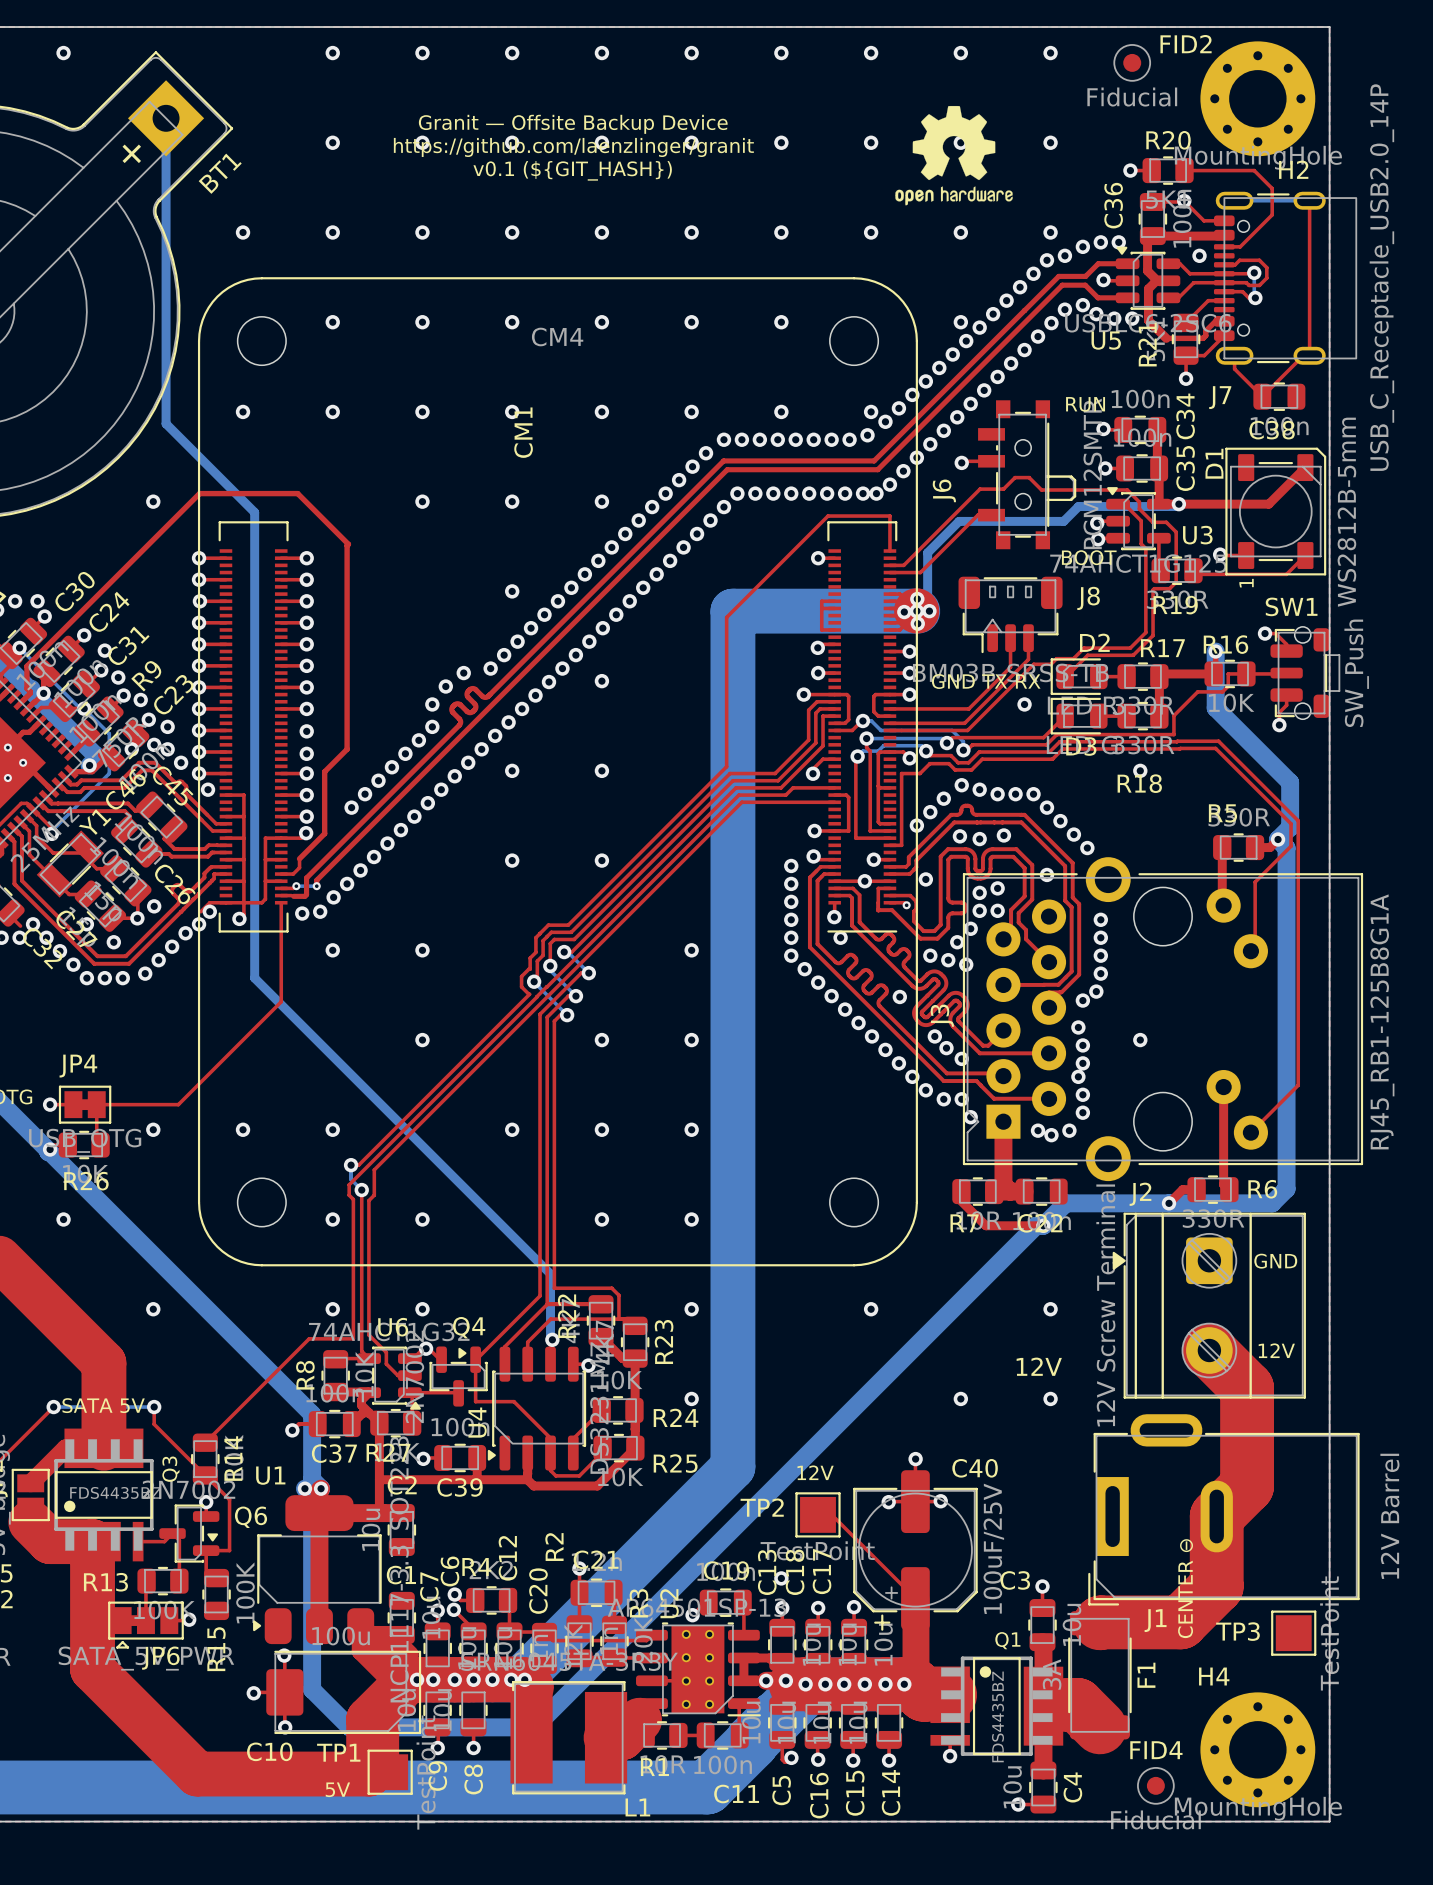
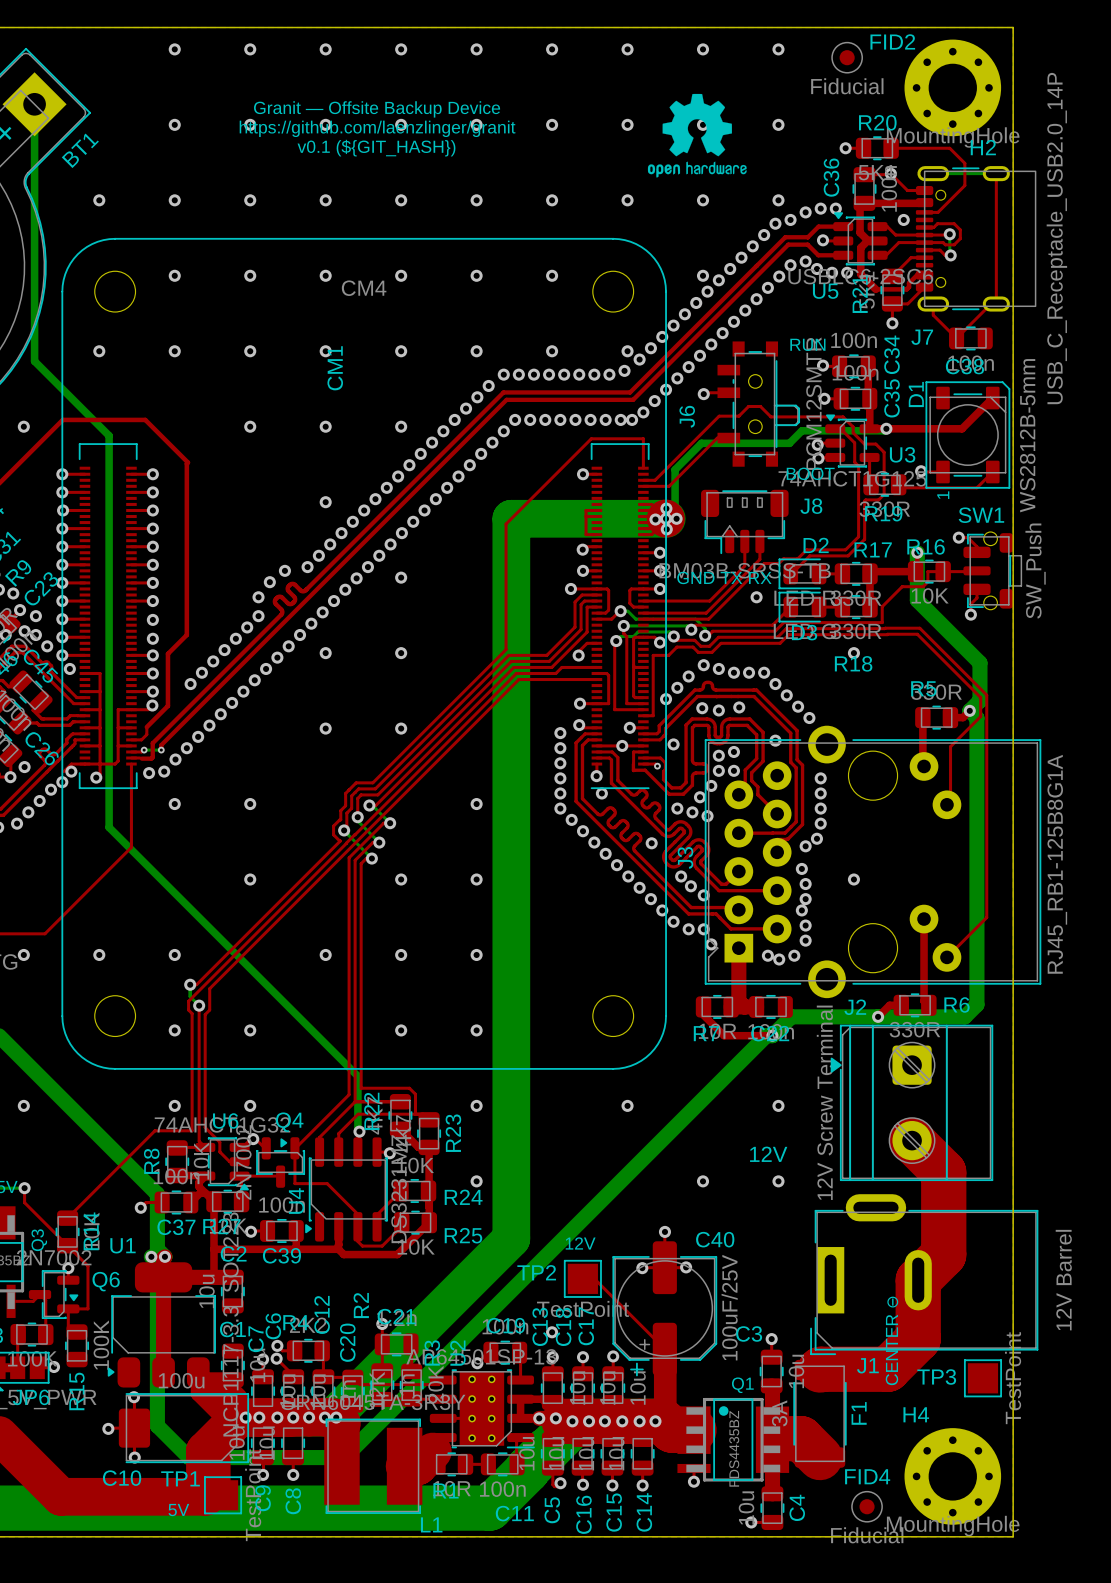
text: GND (1275, 1261) -> none
text: 12V (1276, 1350) -> none

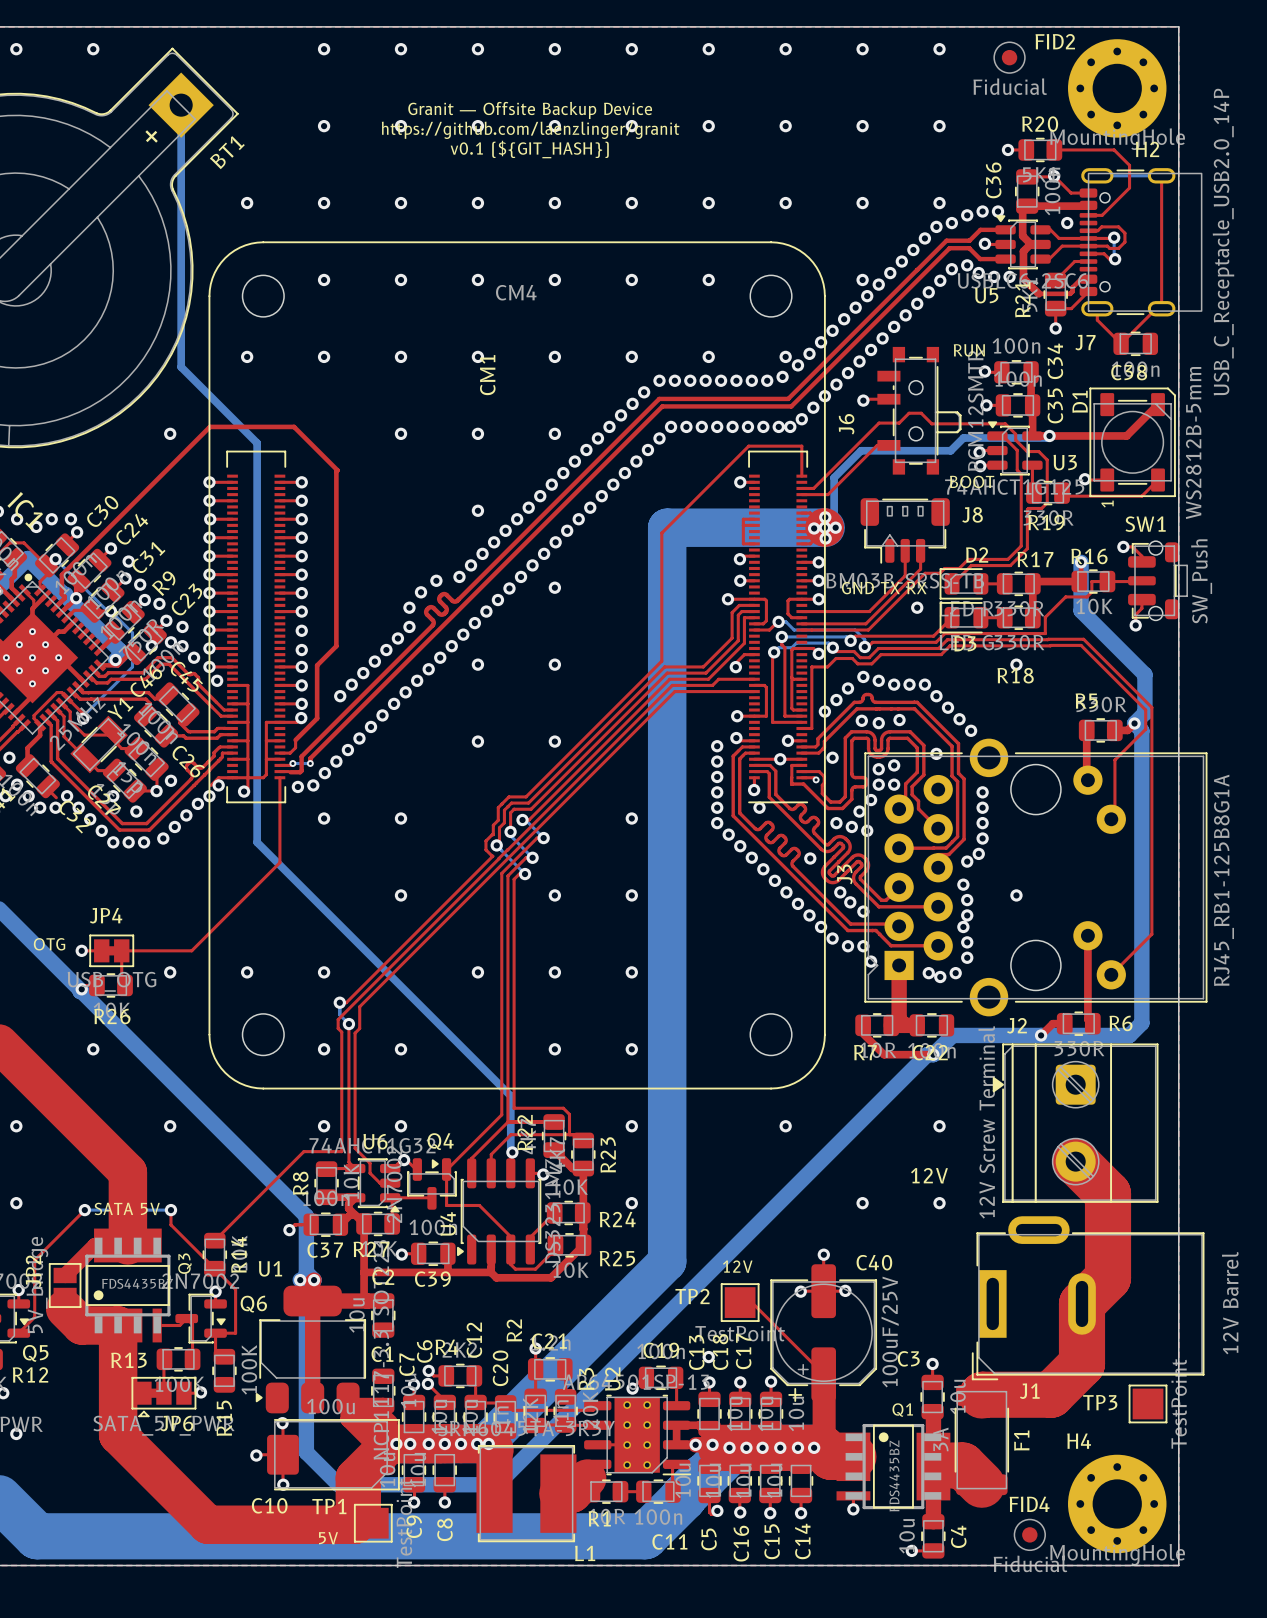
drawing: [647, 93, 747, 178] -> none
text: CENTER ⊖ (892, 1340) -> none

